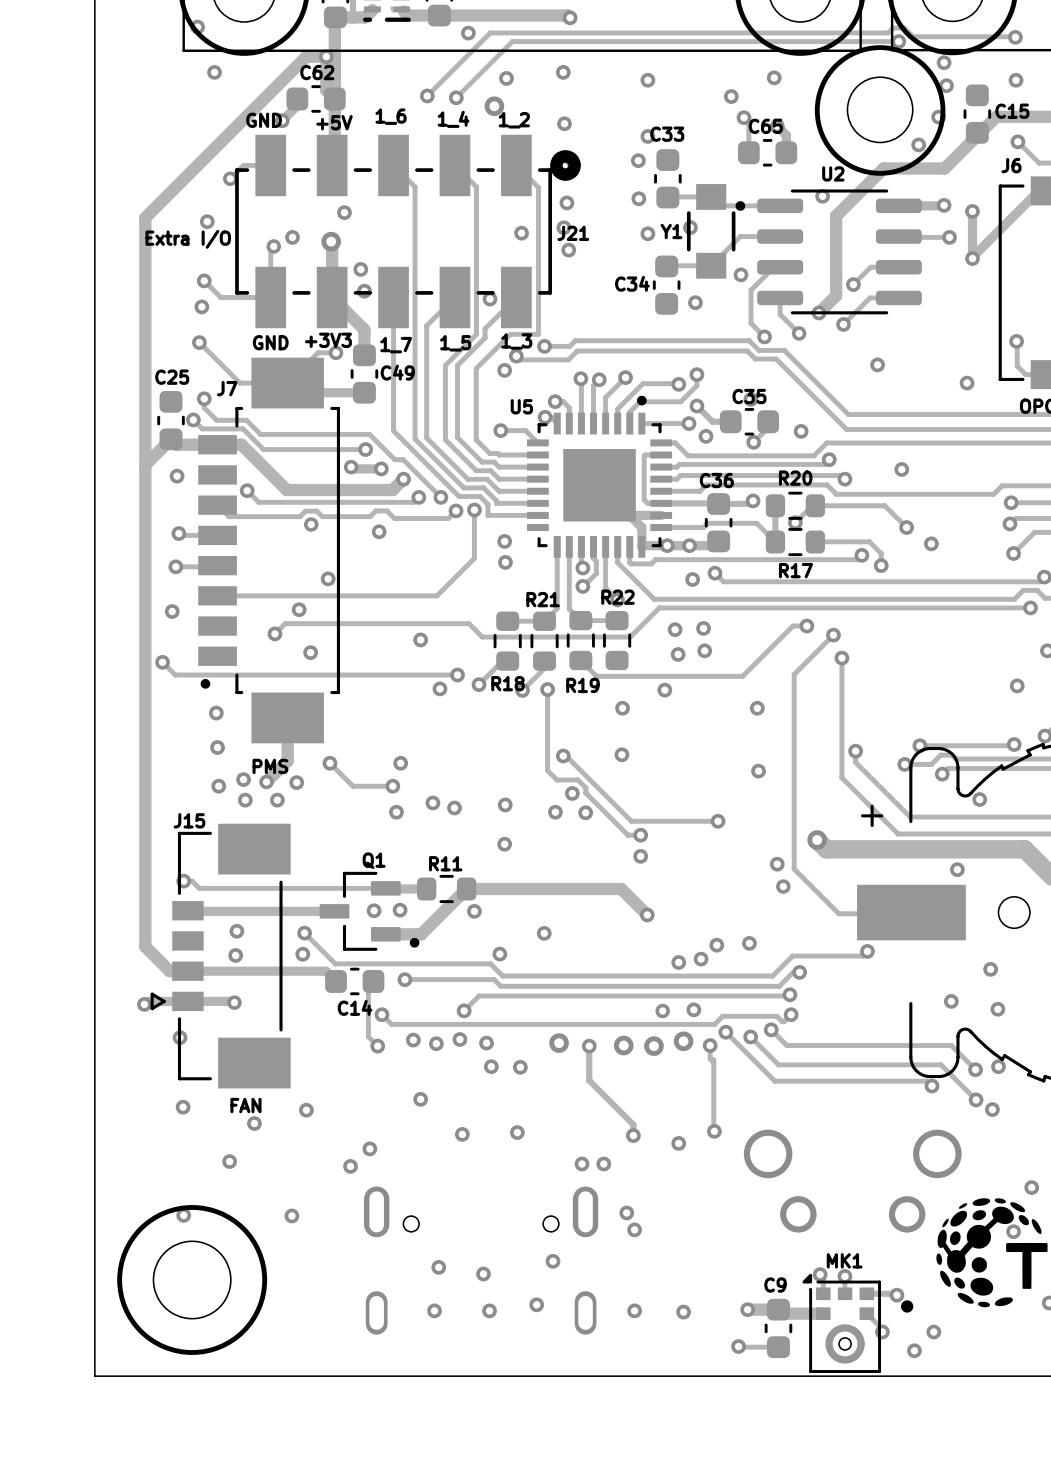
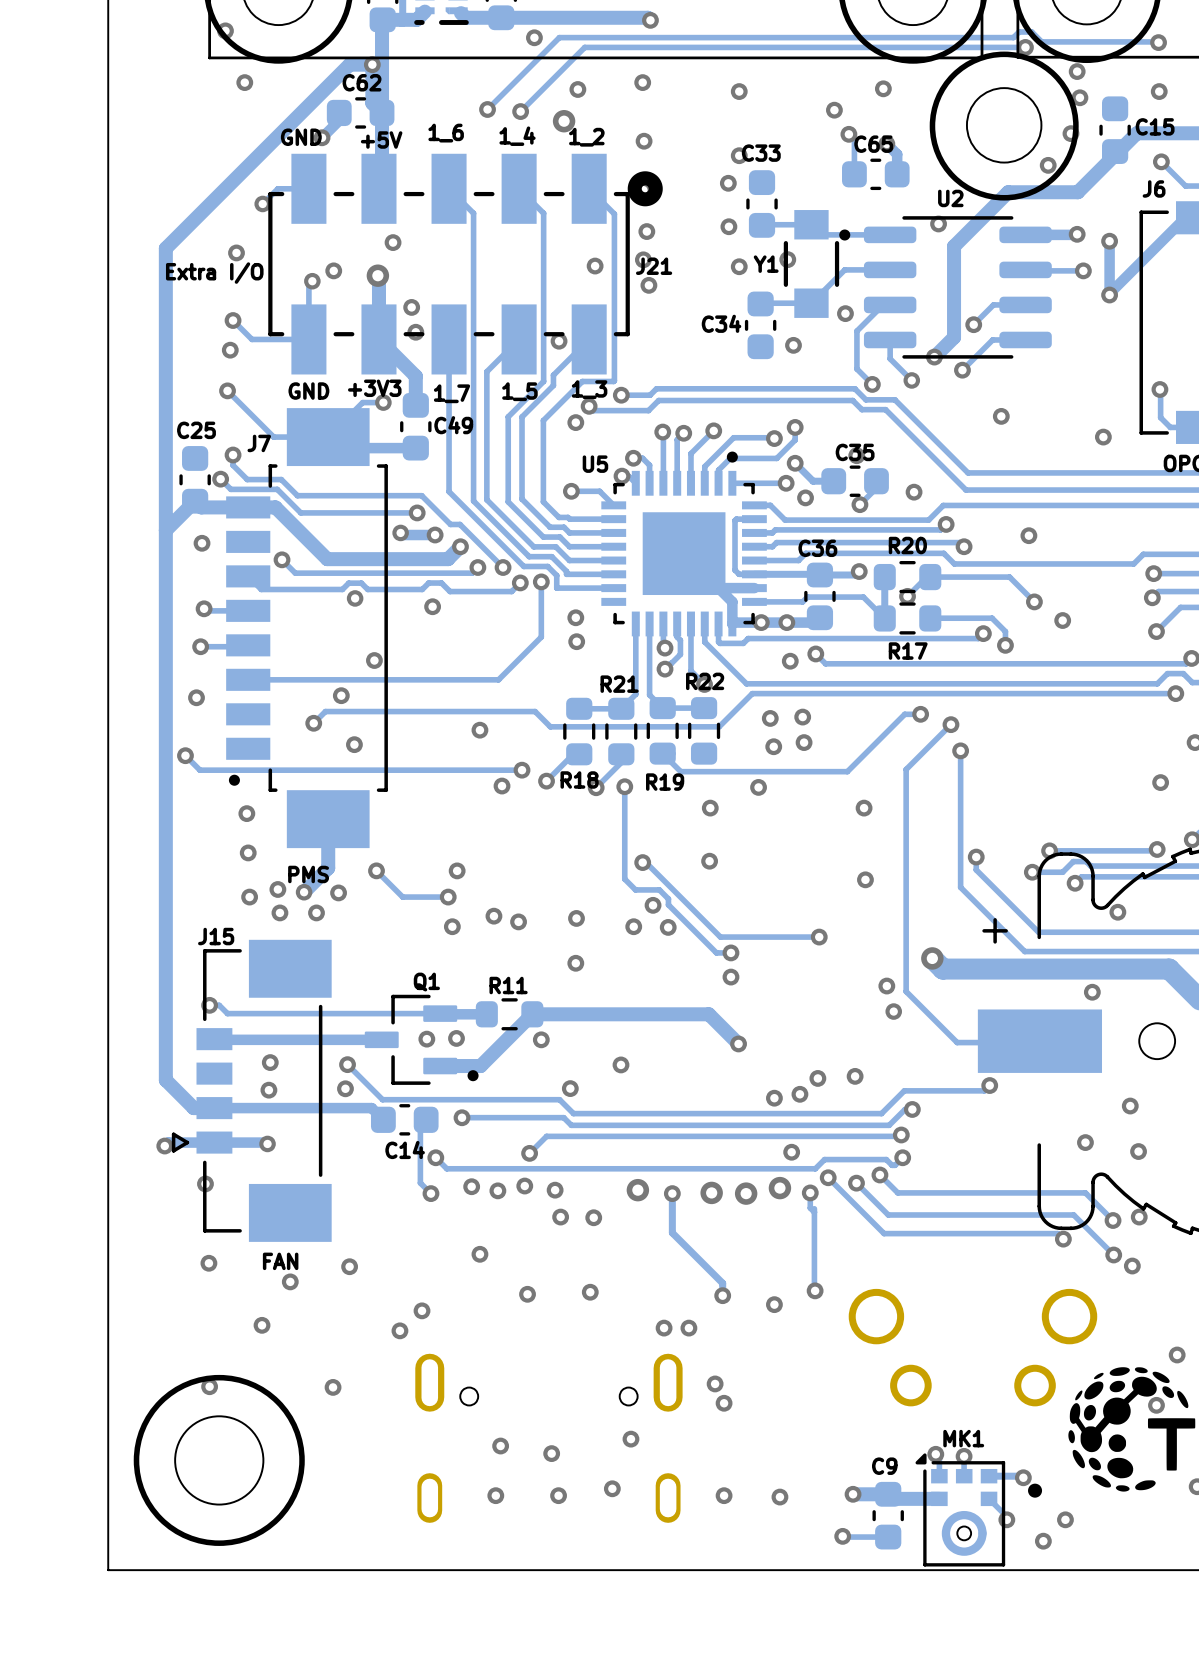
via: (662, 1010) -> none

